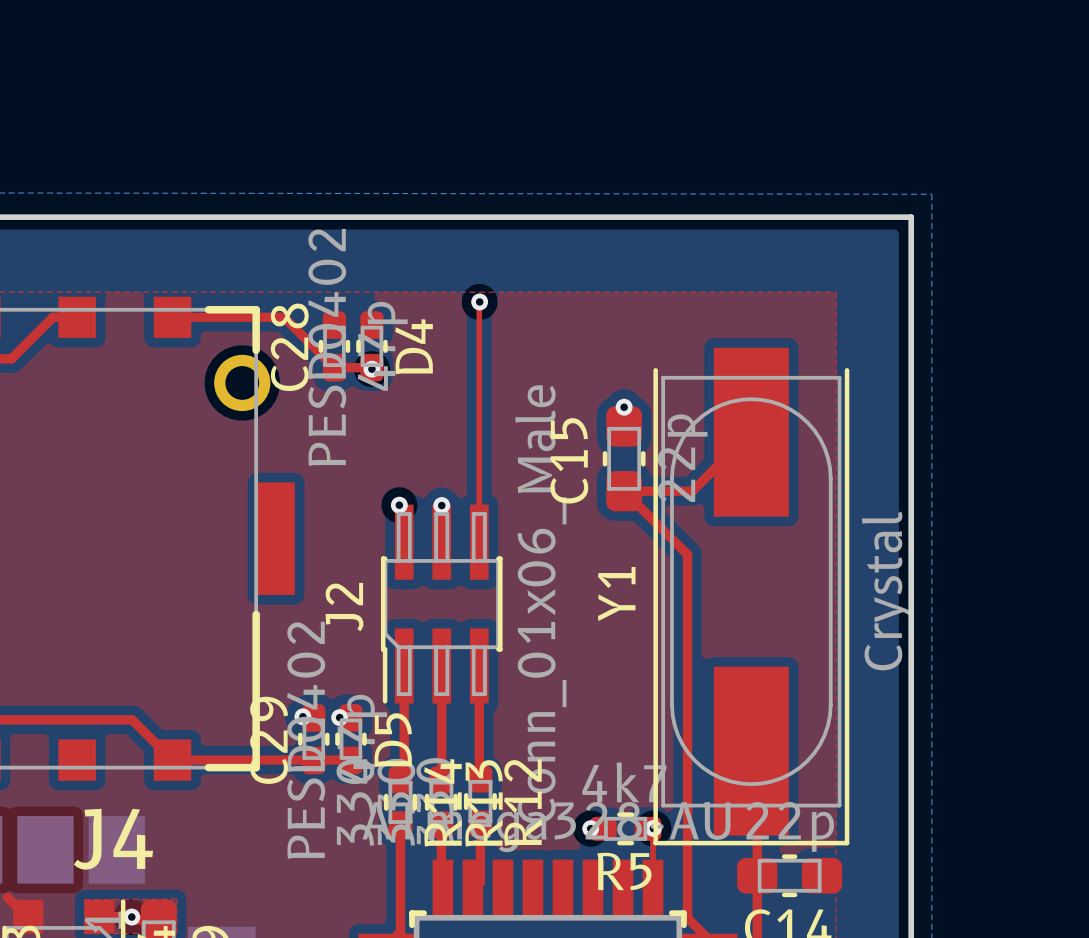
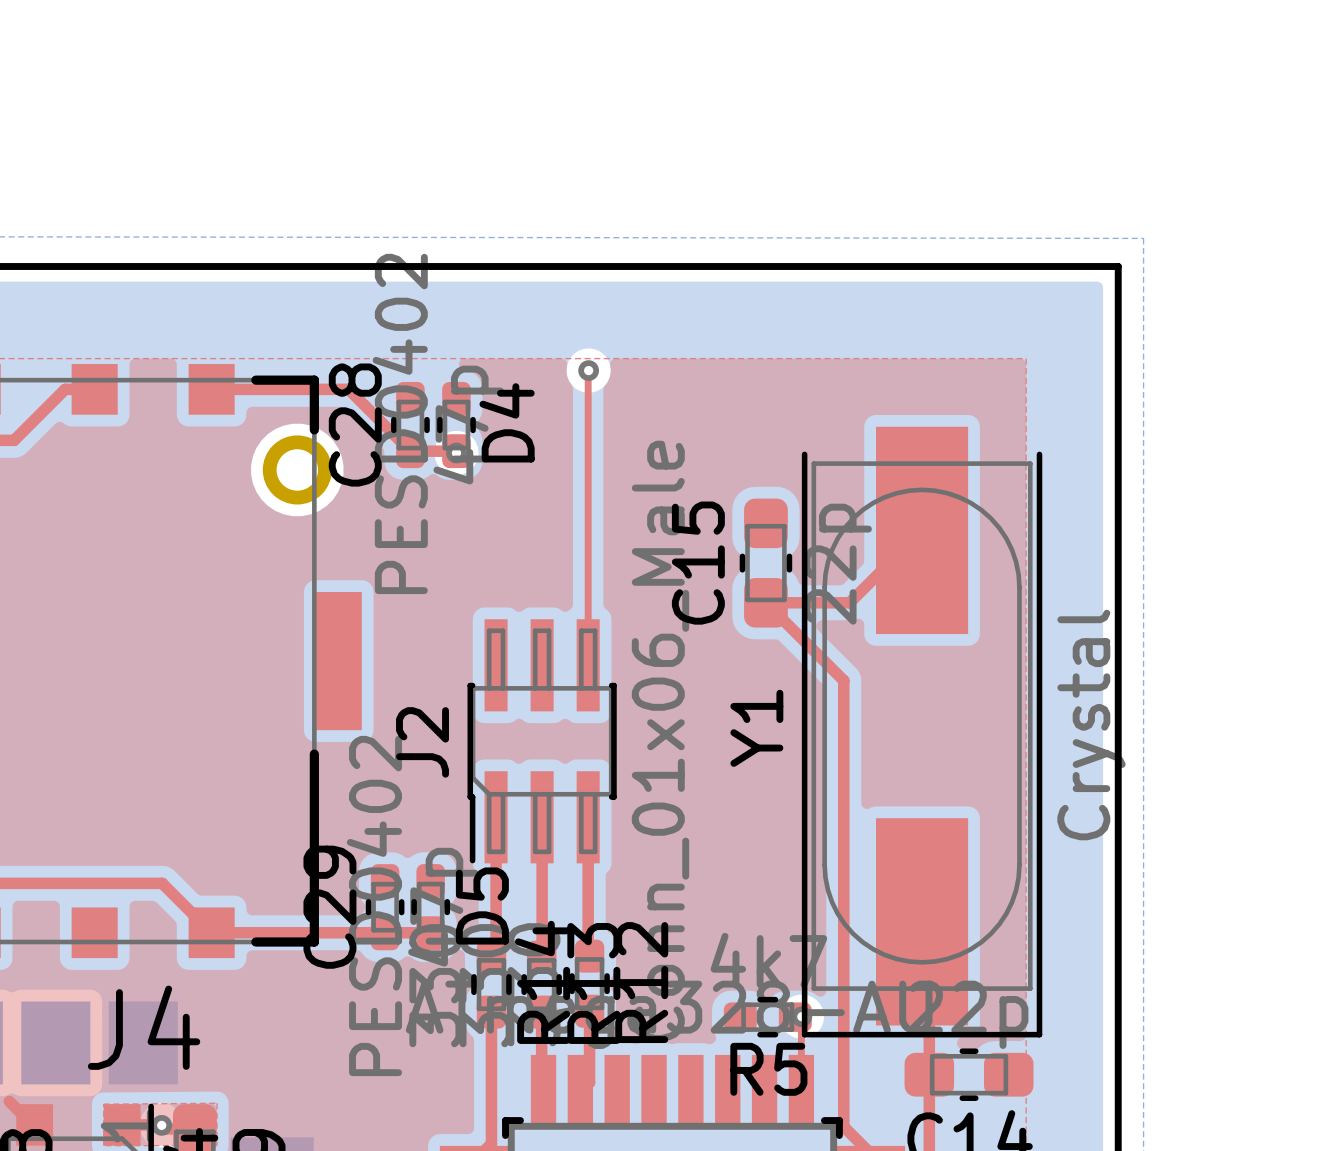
via: (624, 407) -> none
via: (399, 505) -> none
via: (441, 505) -> none
via: (302, 716) -> none
via: (339, 717) -> none
via: (590, 828) -> none

